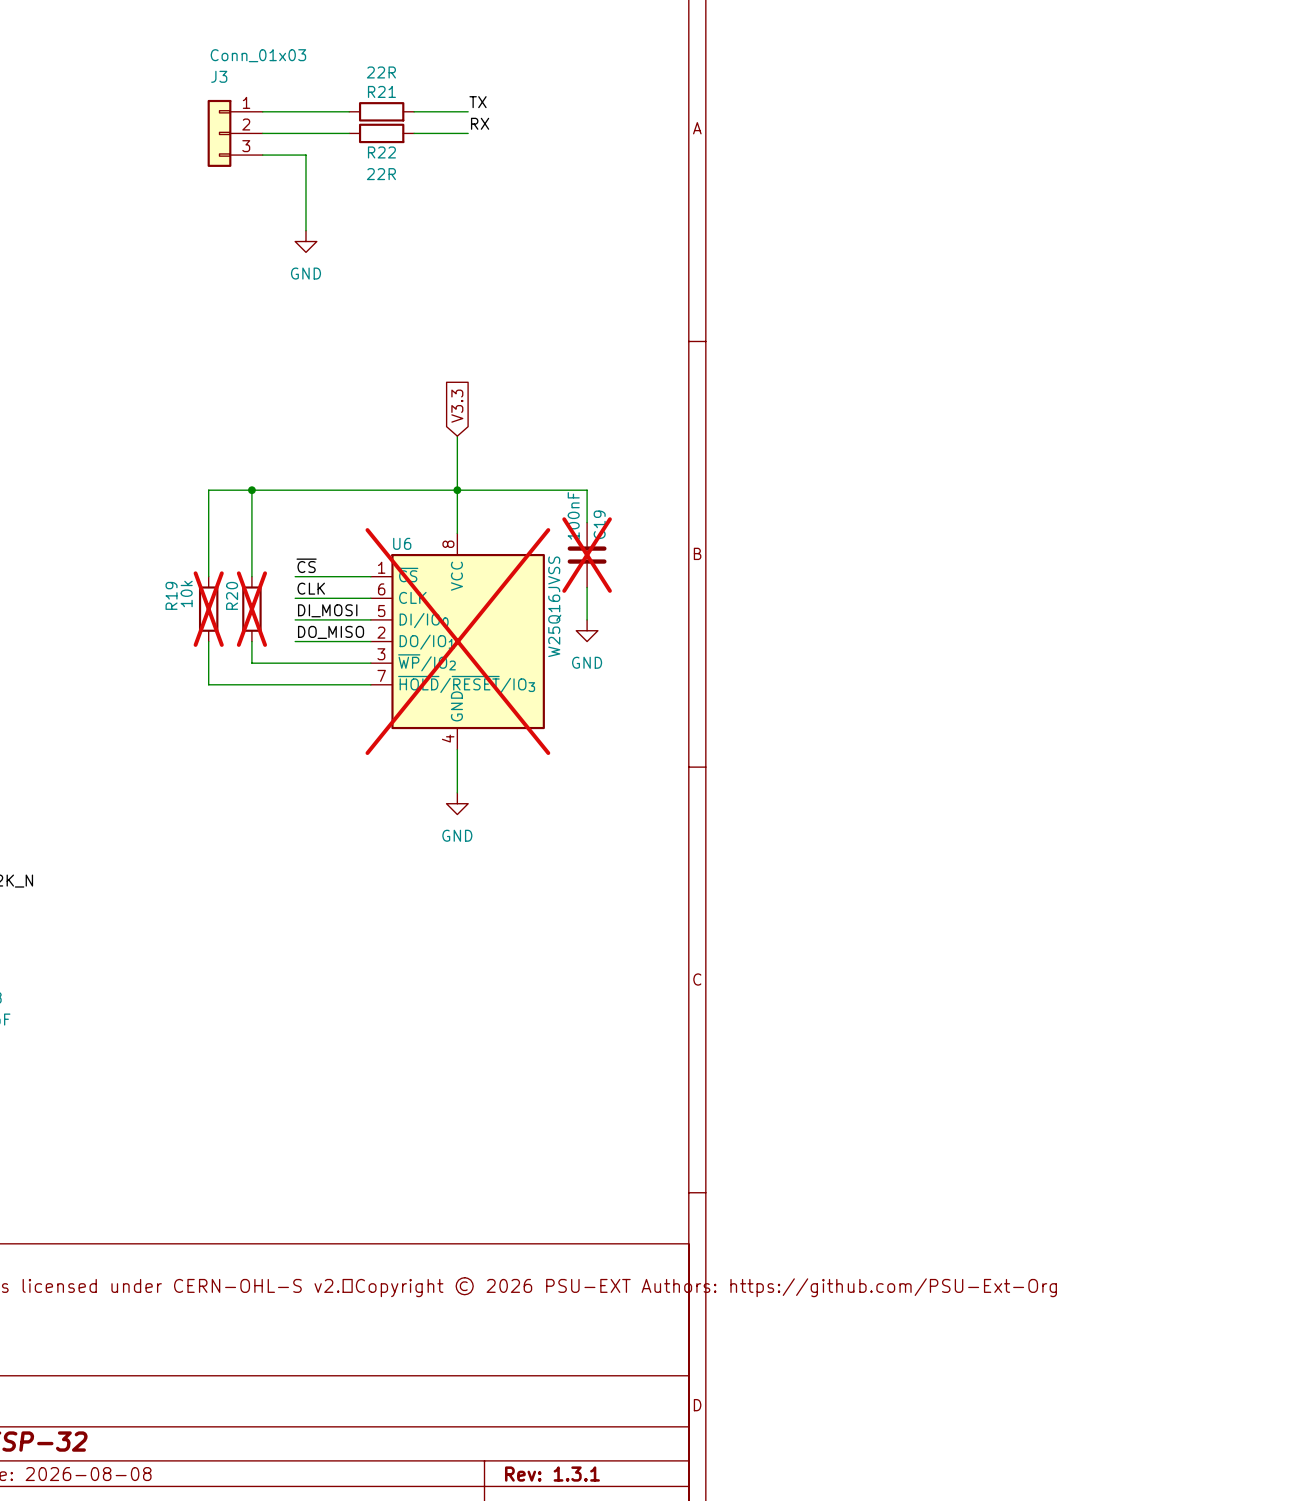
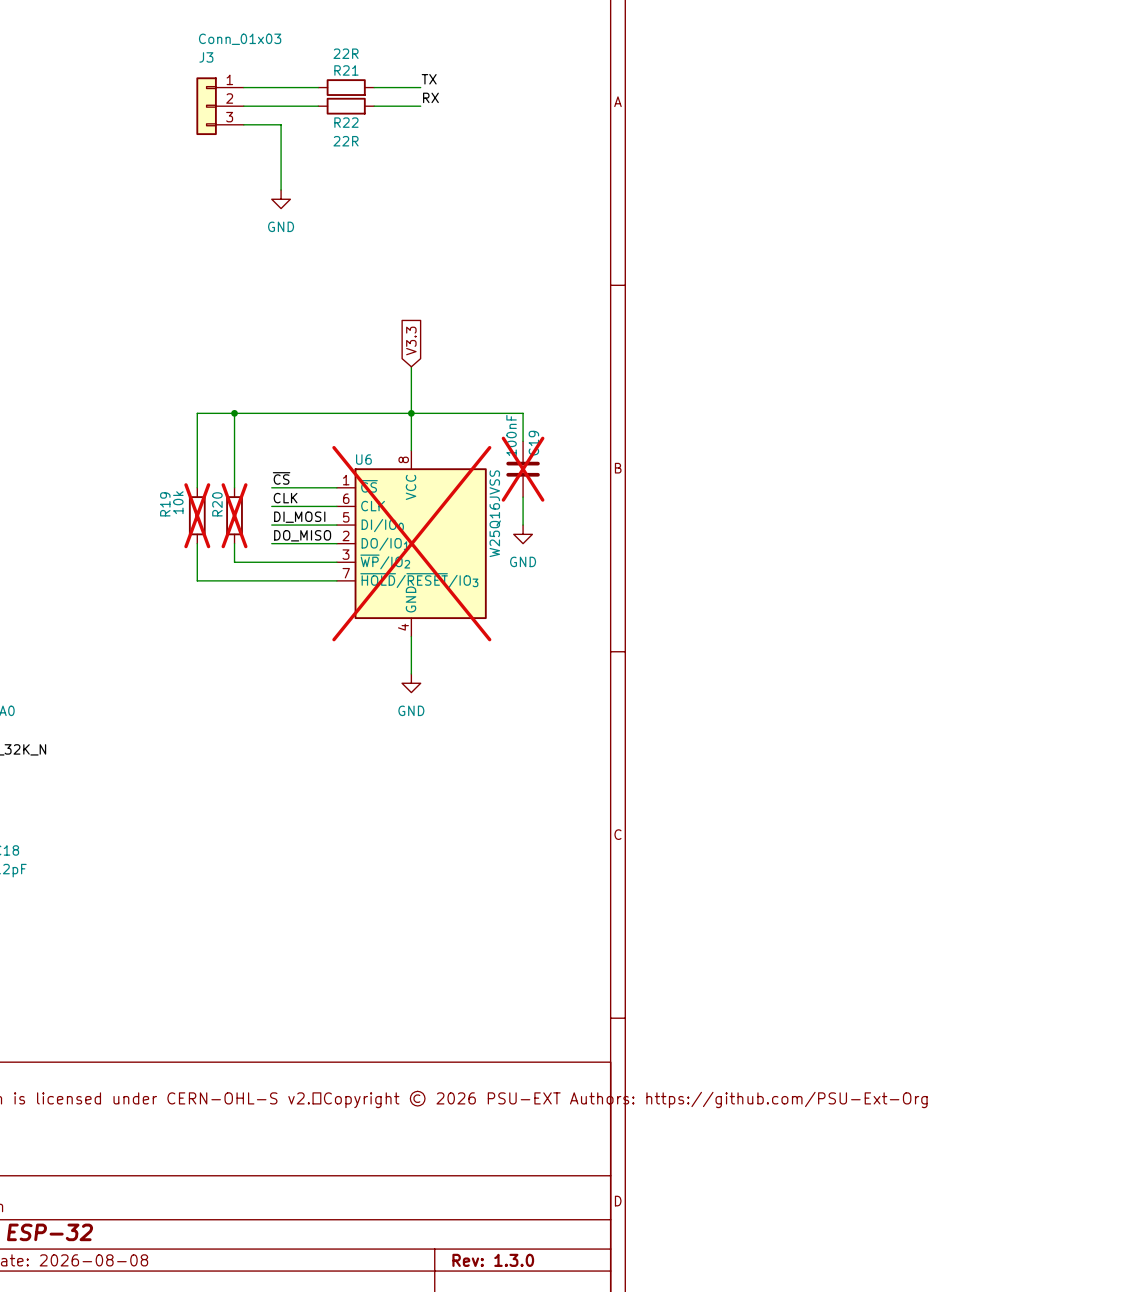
title block: Rev: 1.3.1 (552, 1474) -> Rev: 1.3.0 (493, 1260)

